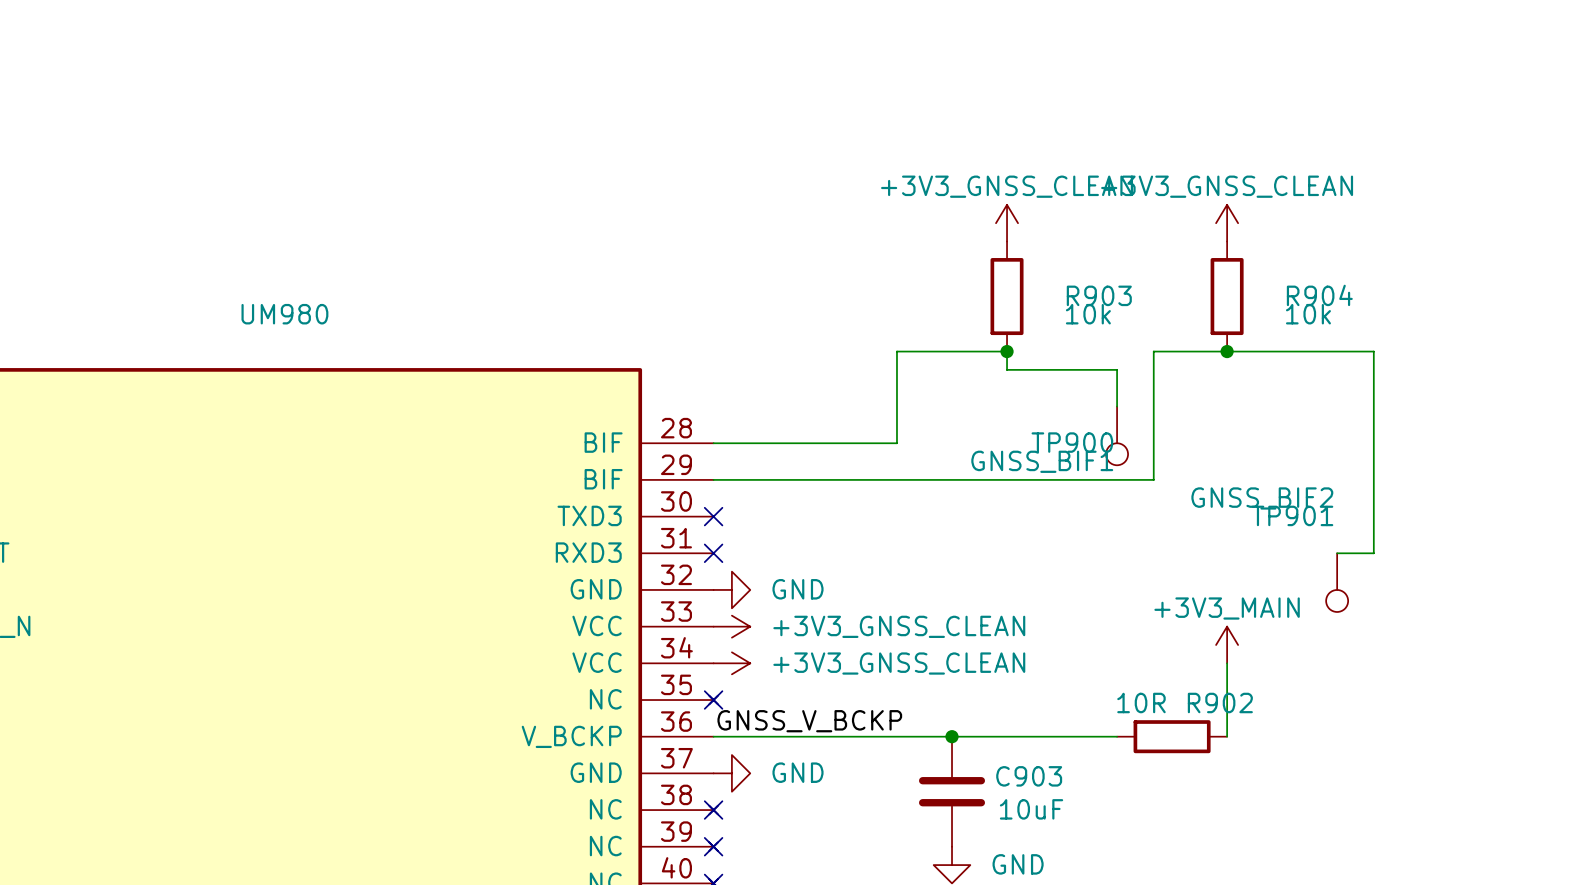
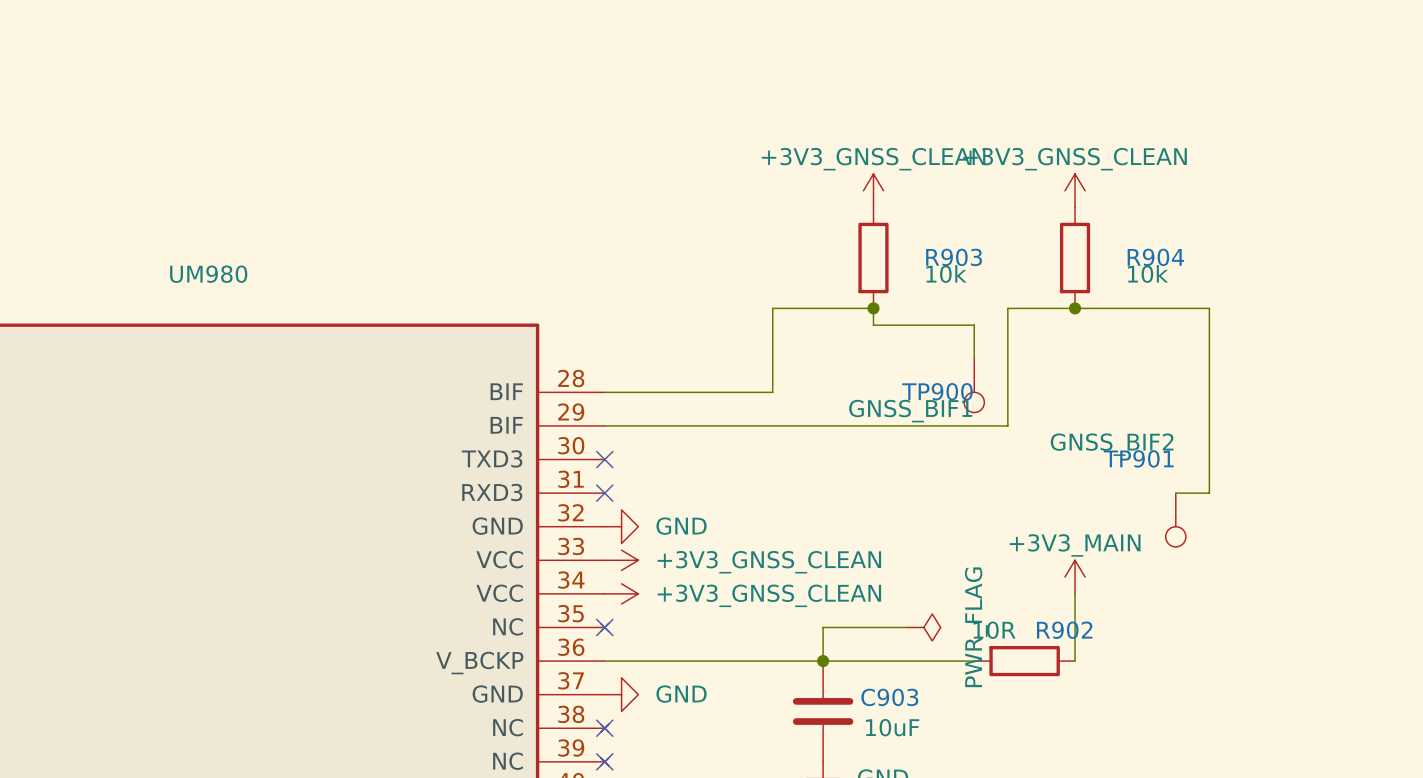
wire: none -> (907, 627) (823, 627) (823, 661)
power symbol: none -> PWR_FLAG (923, 627)
label: GNSS_V_BCKP (809, 721) -> none

